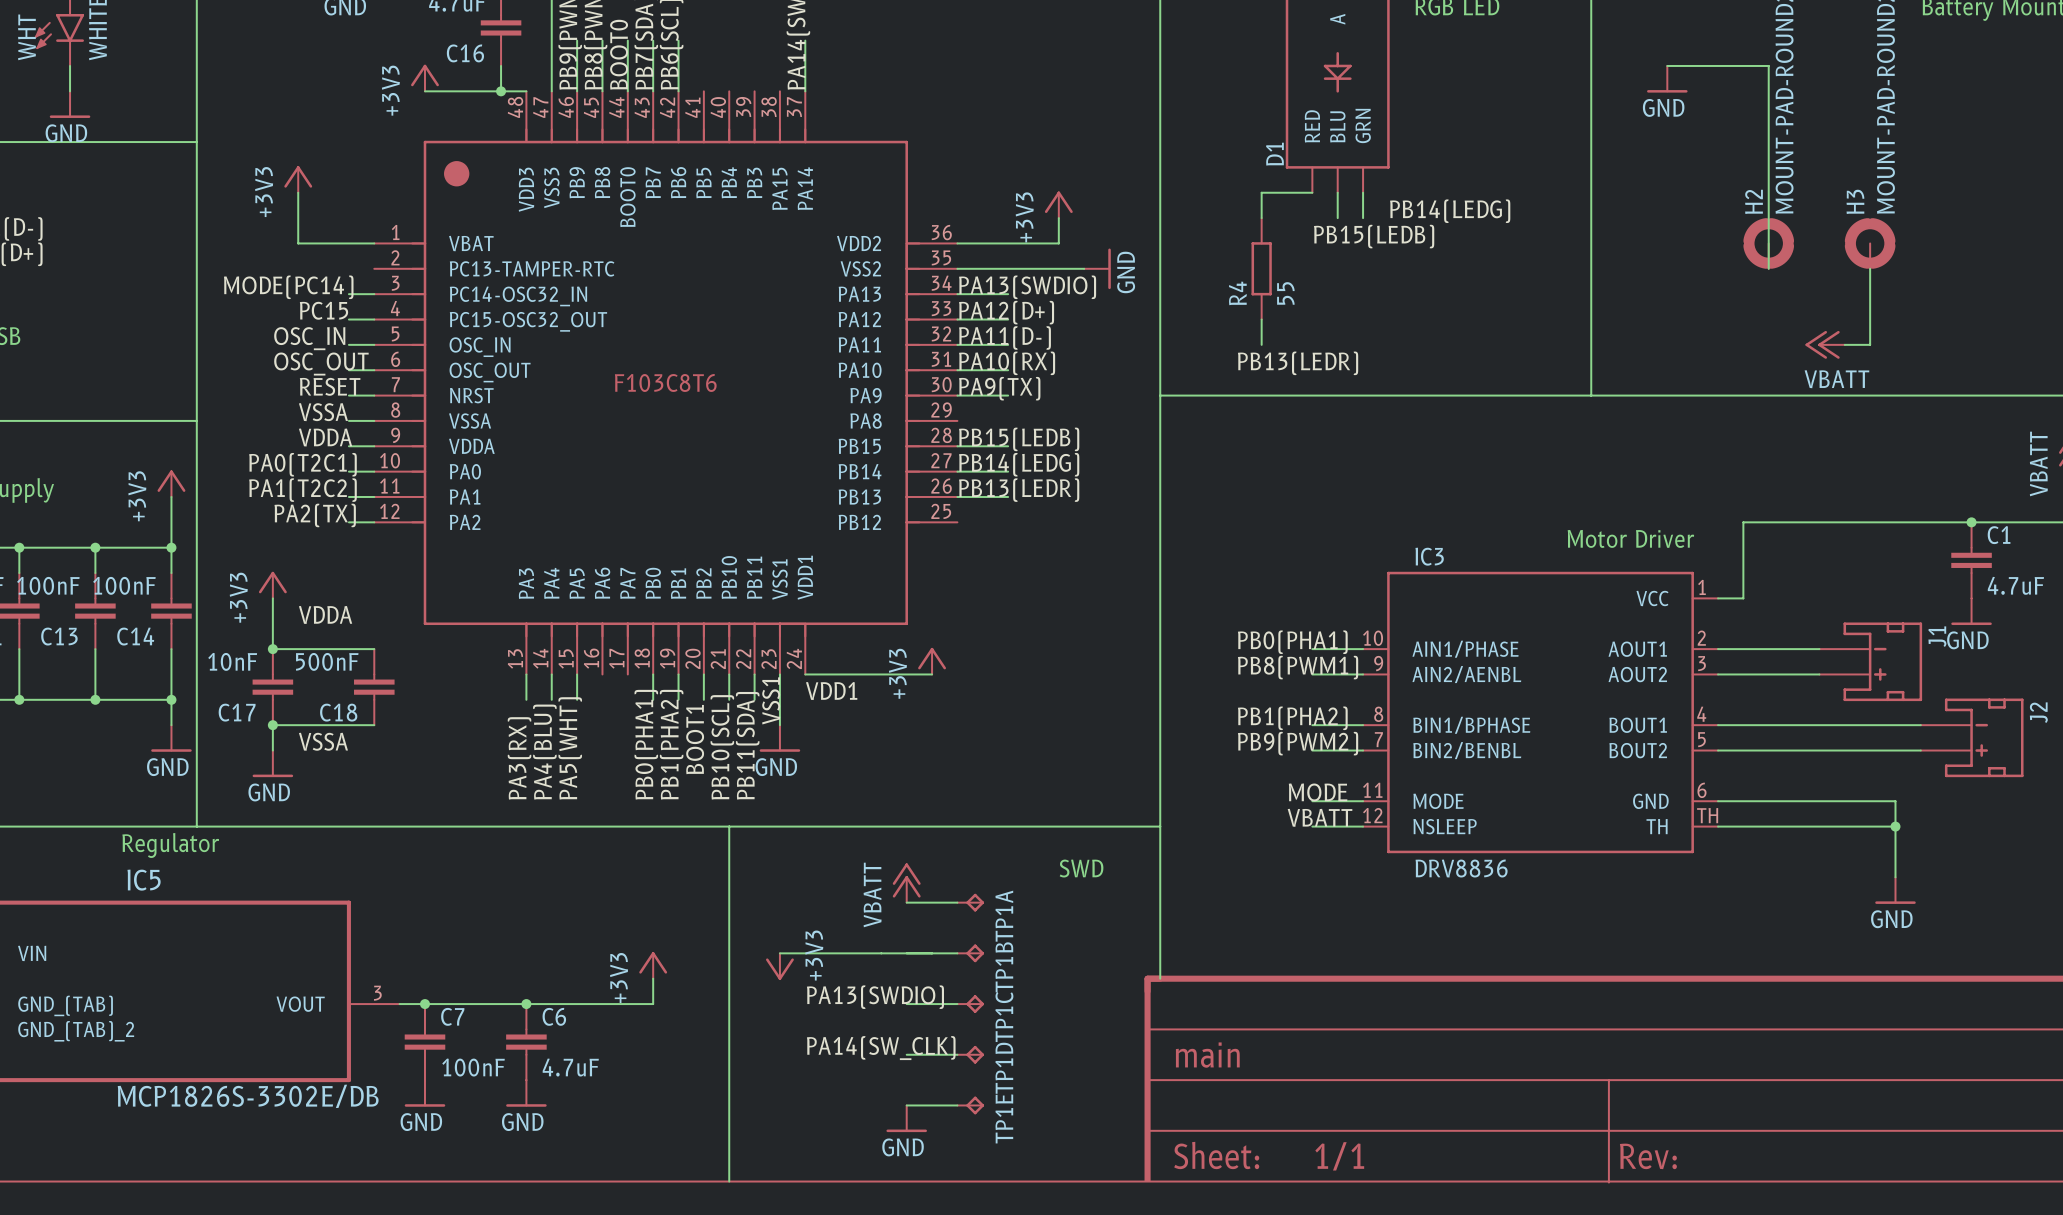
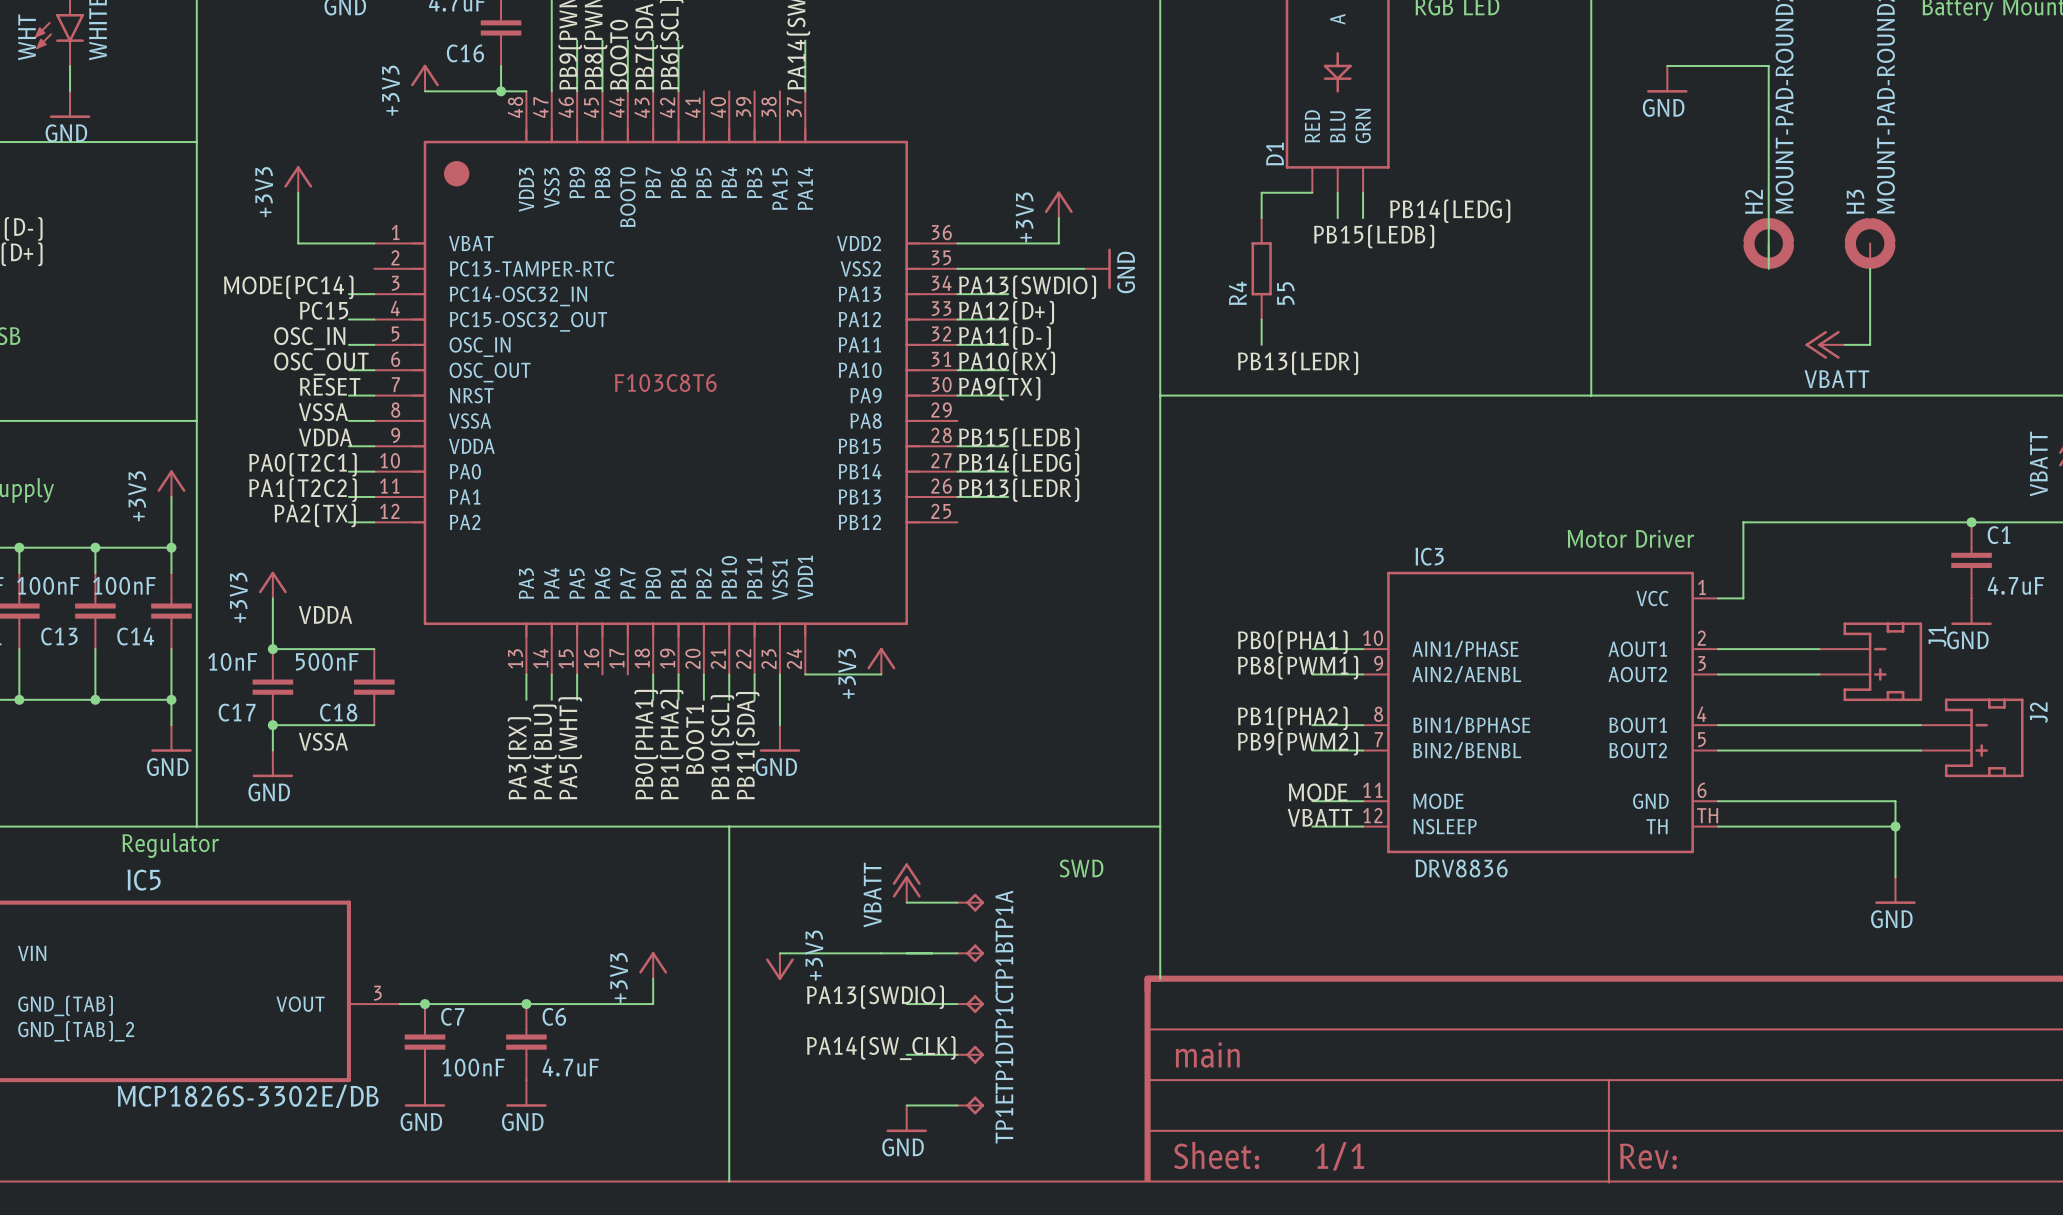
power symbol position: +3V3 (932, 661) -> +3V3 (881, 661)
wire: (881, 674) (932, 674) -> none
label: VDD1 (831, 691) -> none
label: VSS1 (771, 700) -> none

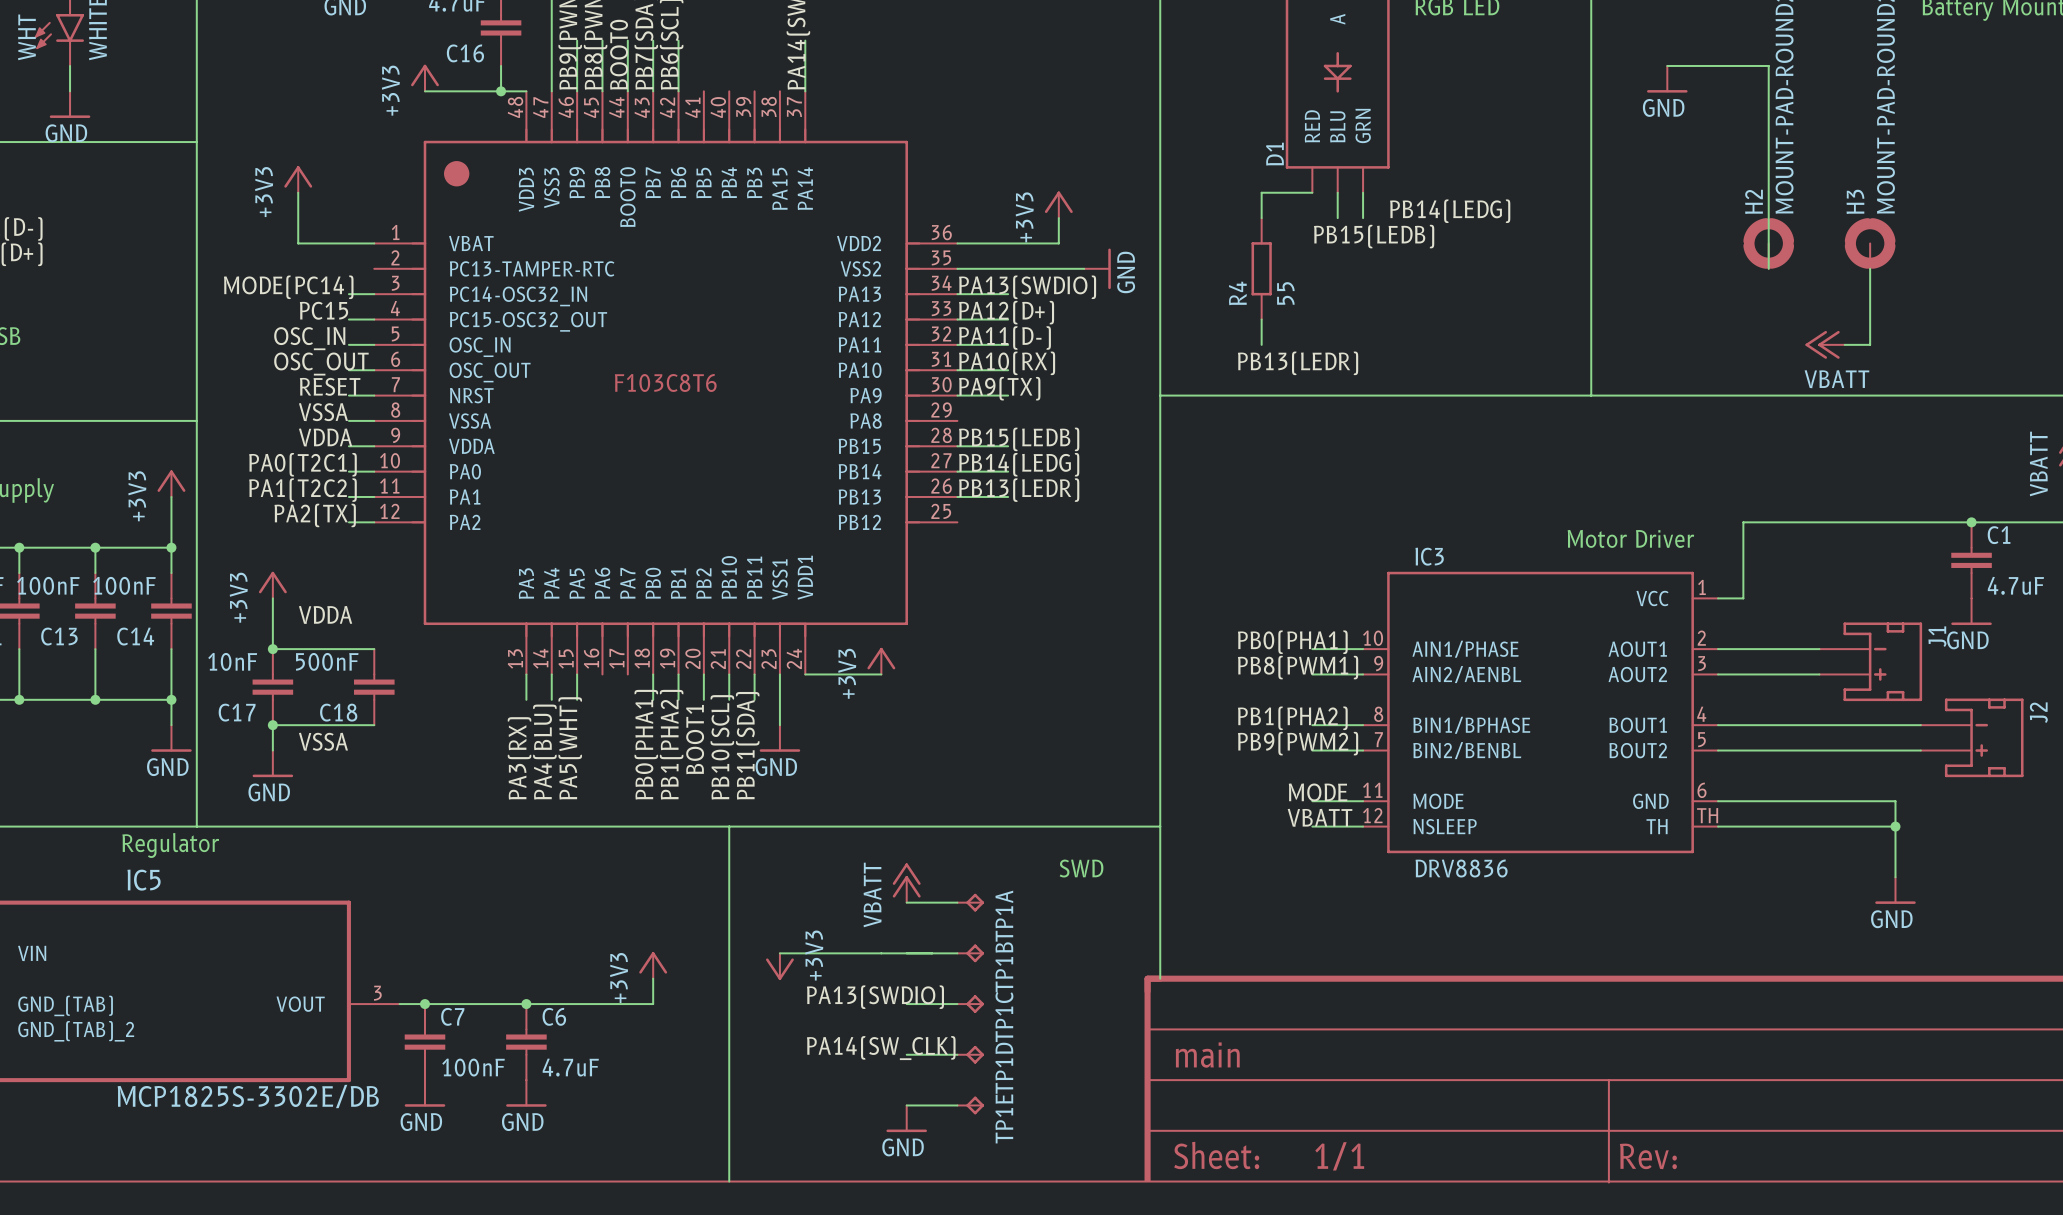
IC5 value: MCP1826S-3302E/DB (248, 1096) -> MCP1825S-3302E/DB (248, 1096)

